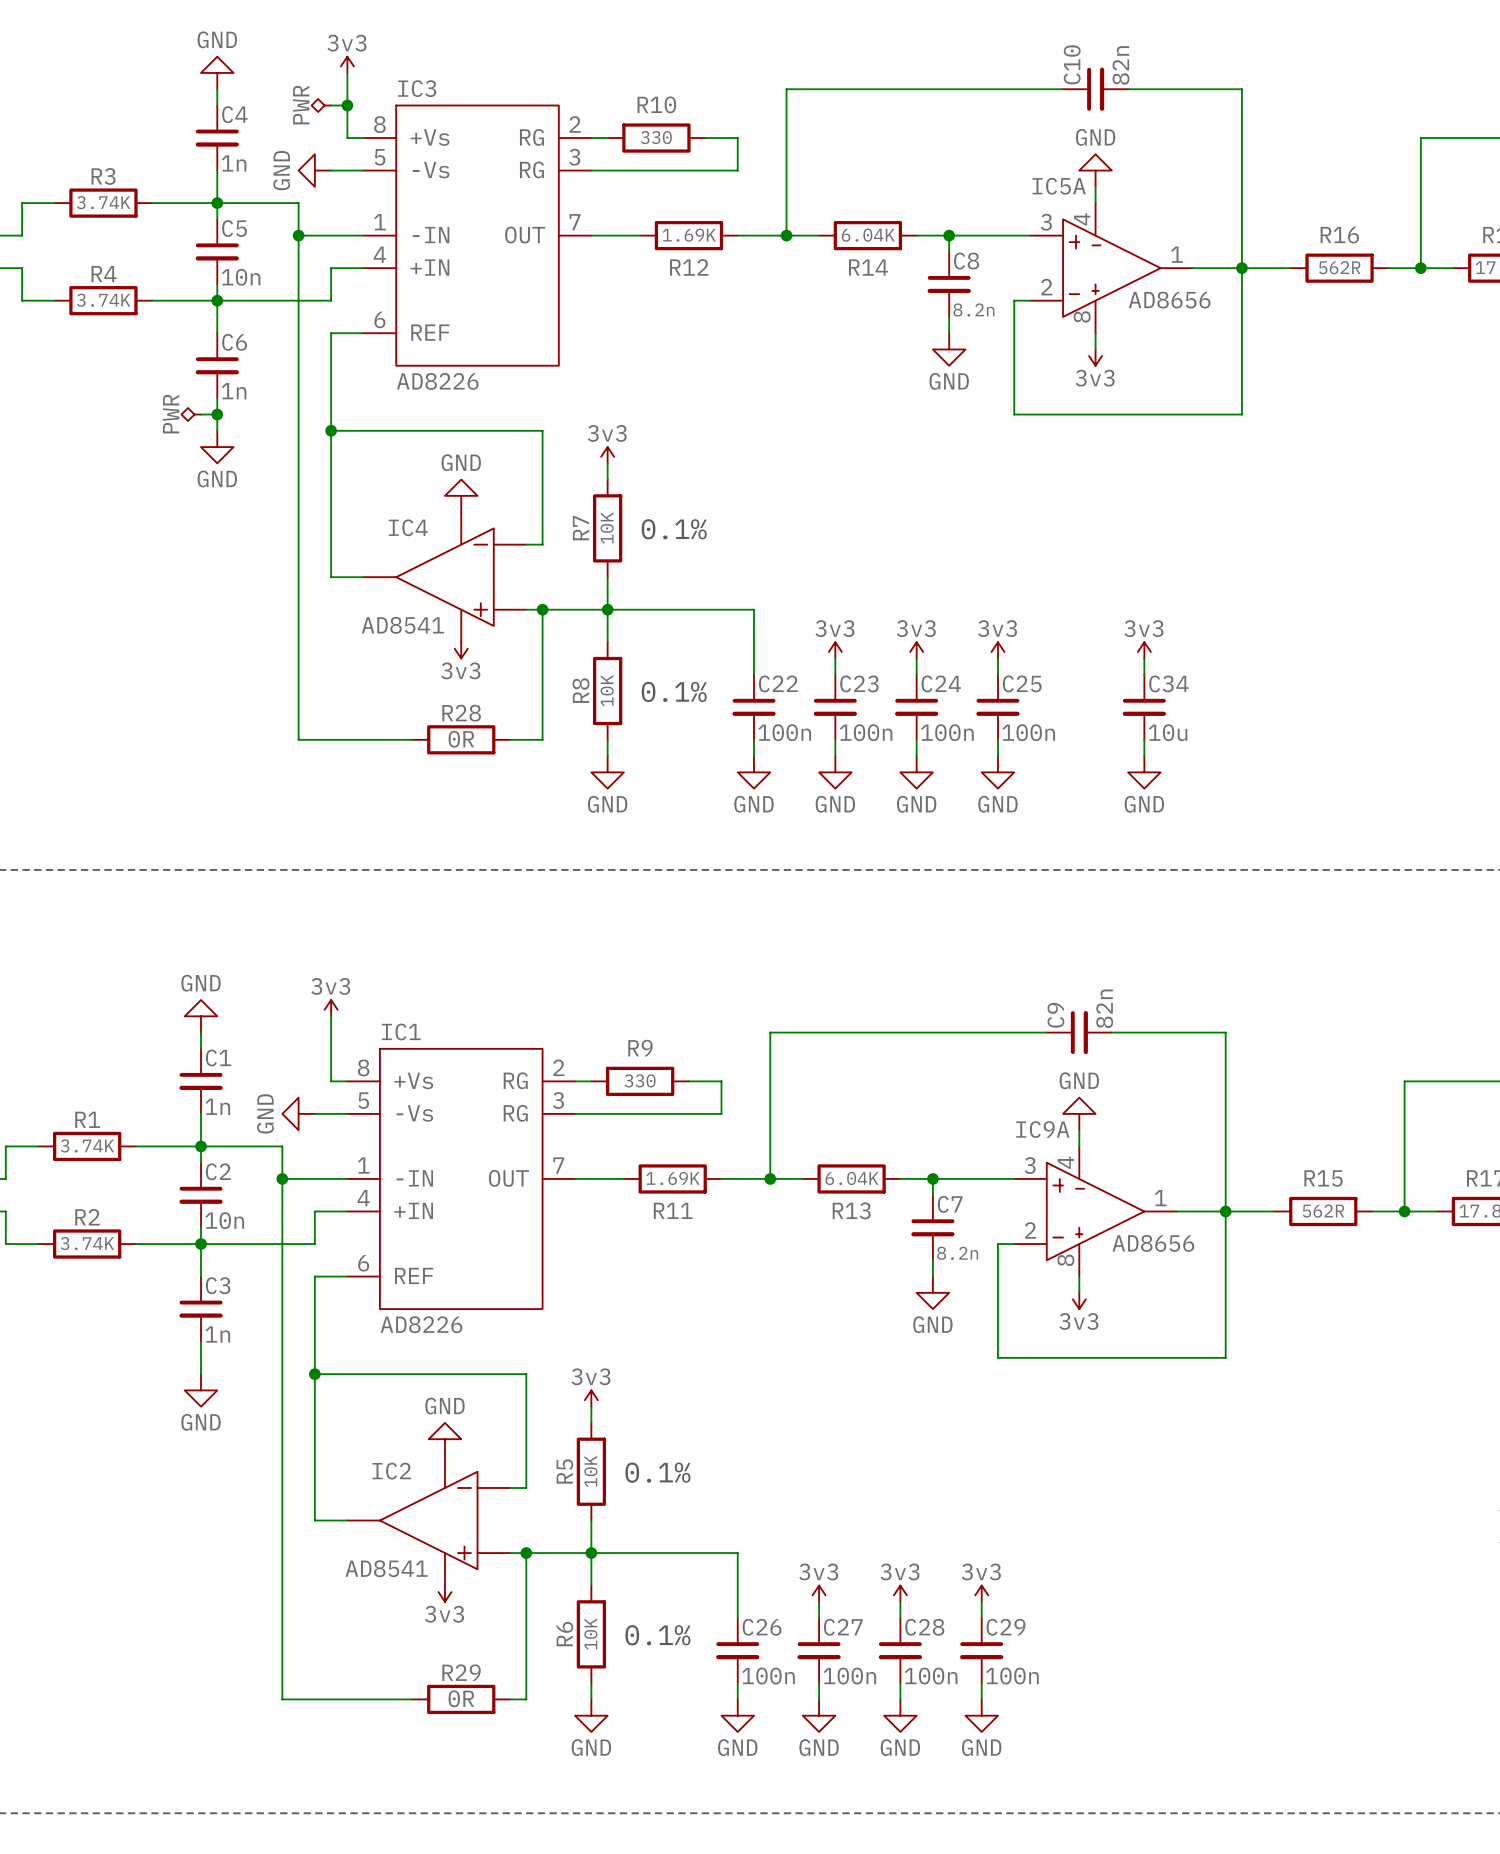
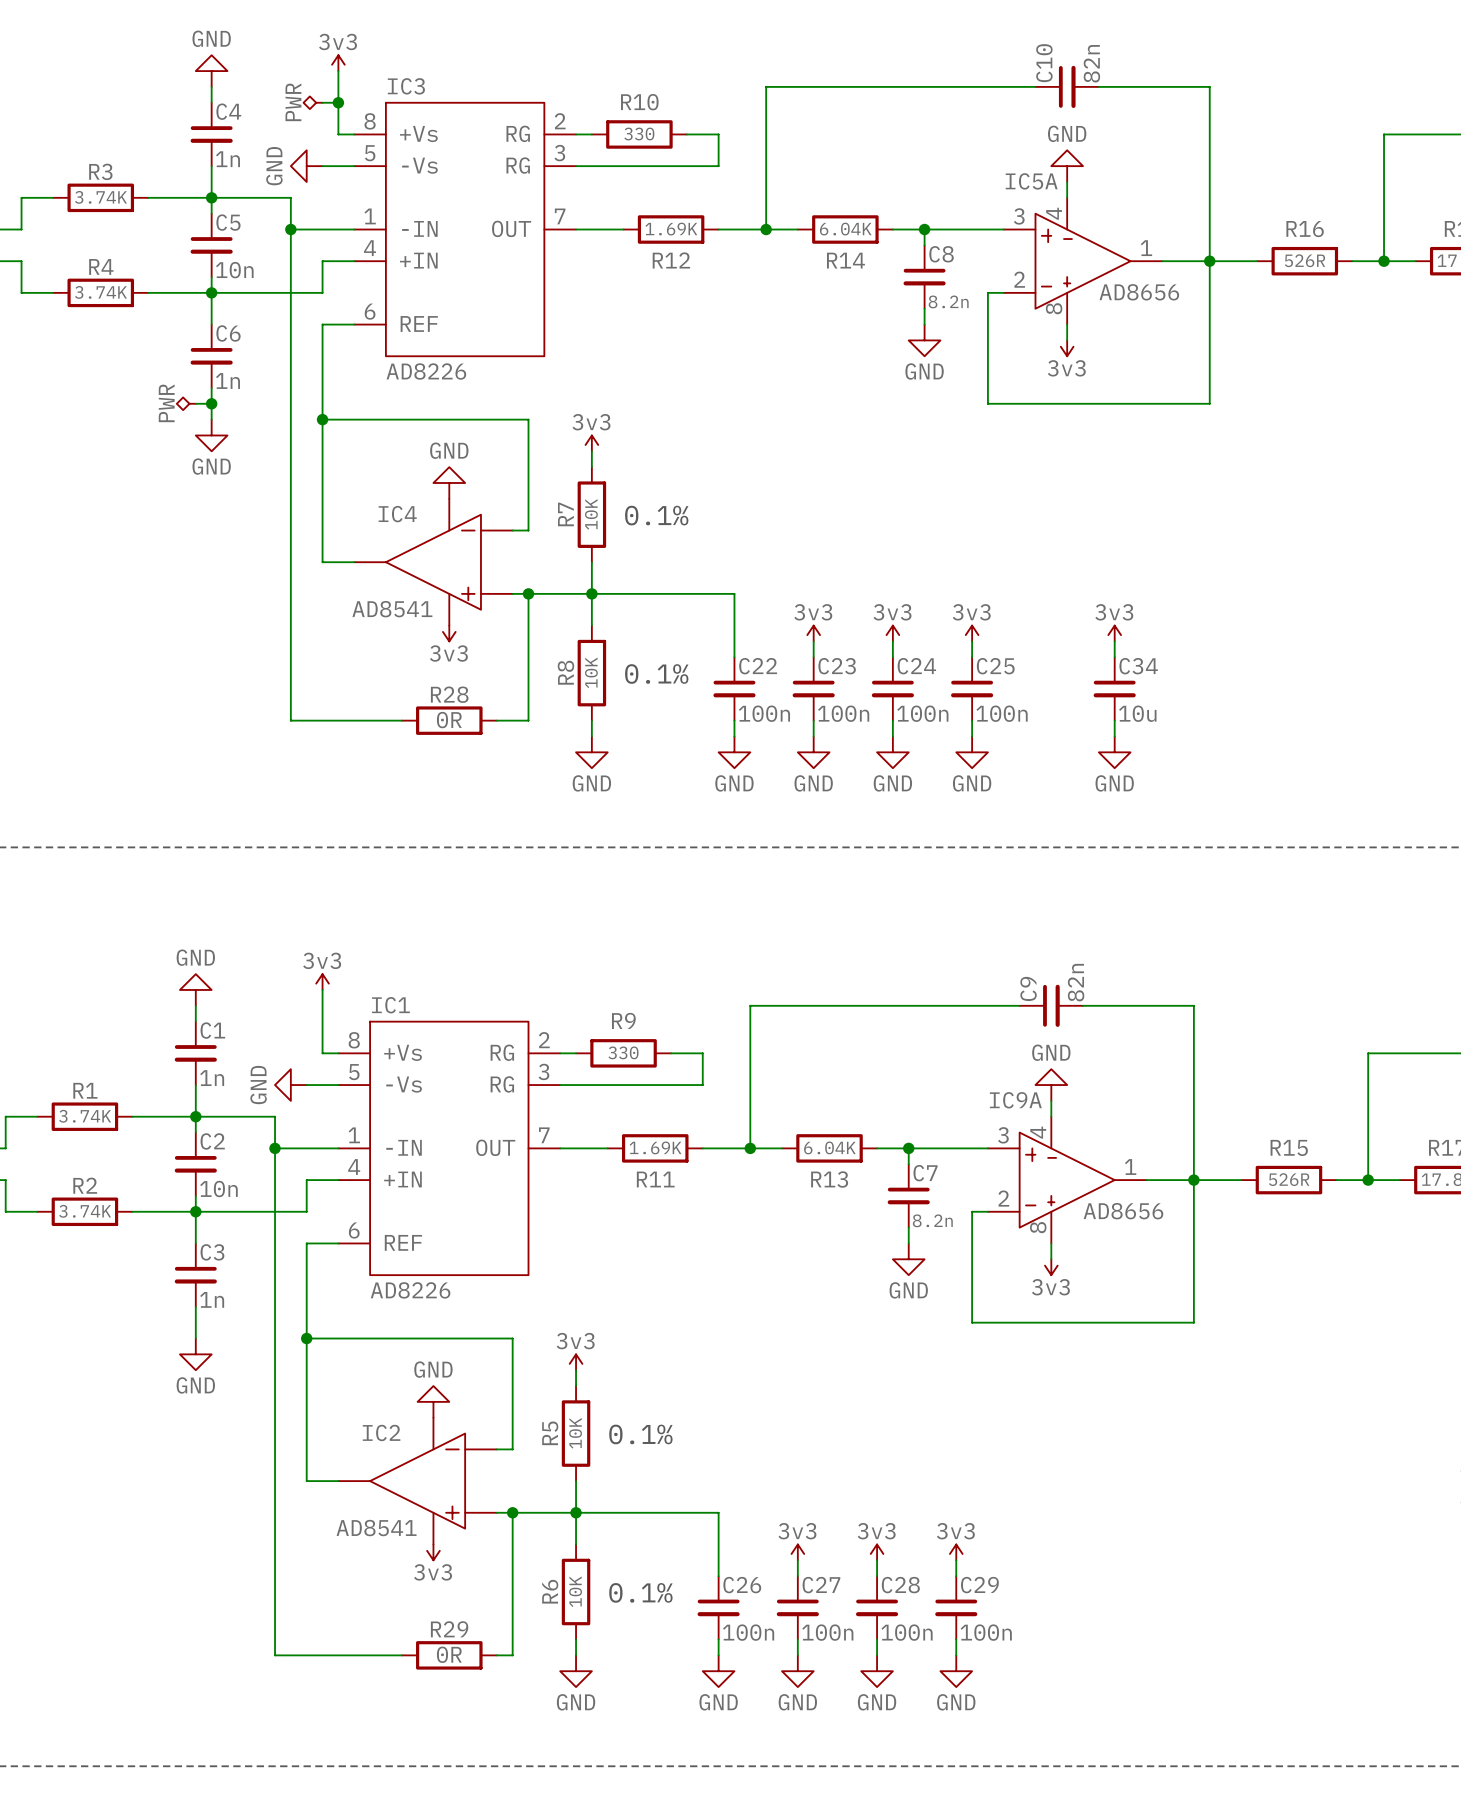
R16 value: 562R (1339, 267) -> 526R (1305, 260)
R15 value: 562R (1323, 1211) -> 526R (1289, 1179)

